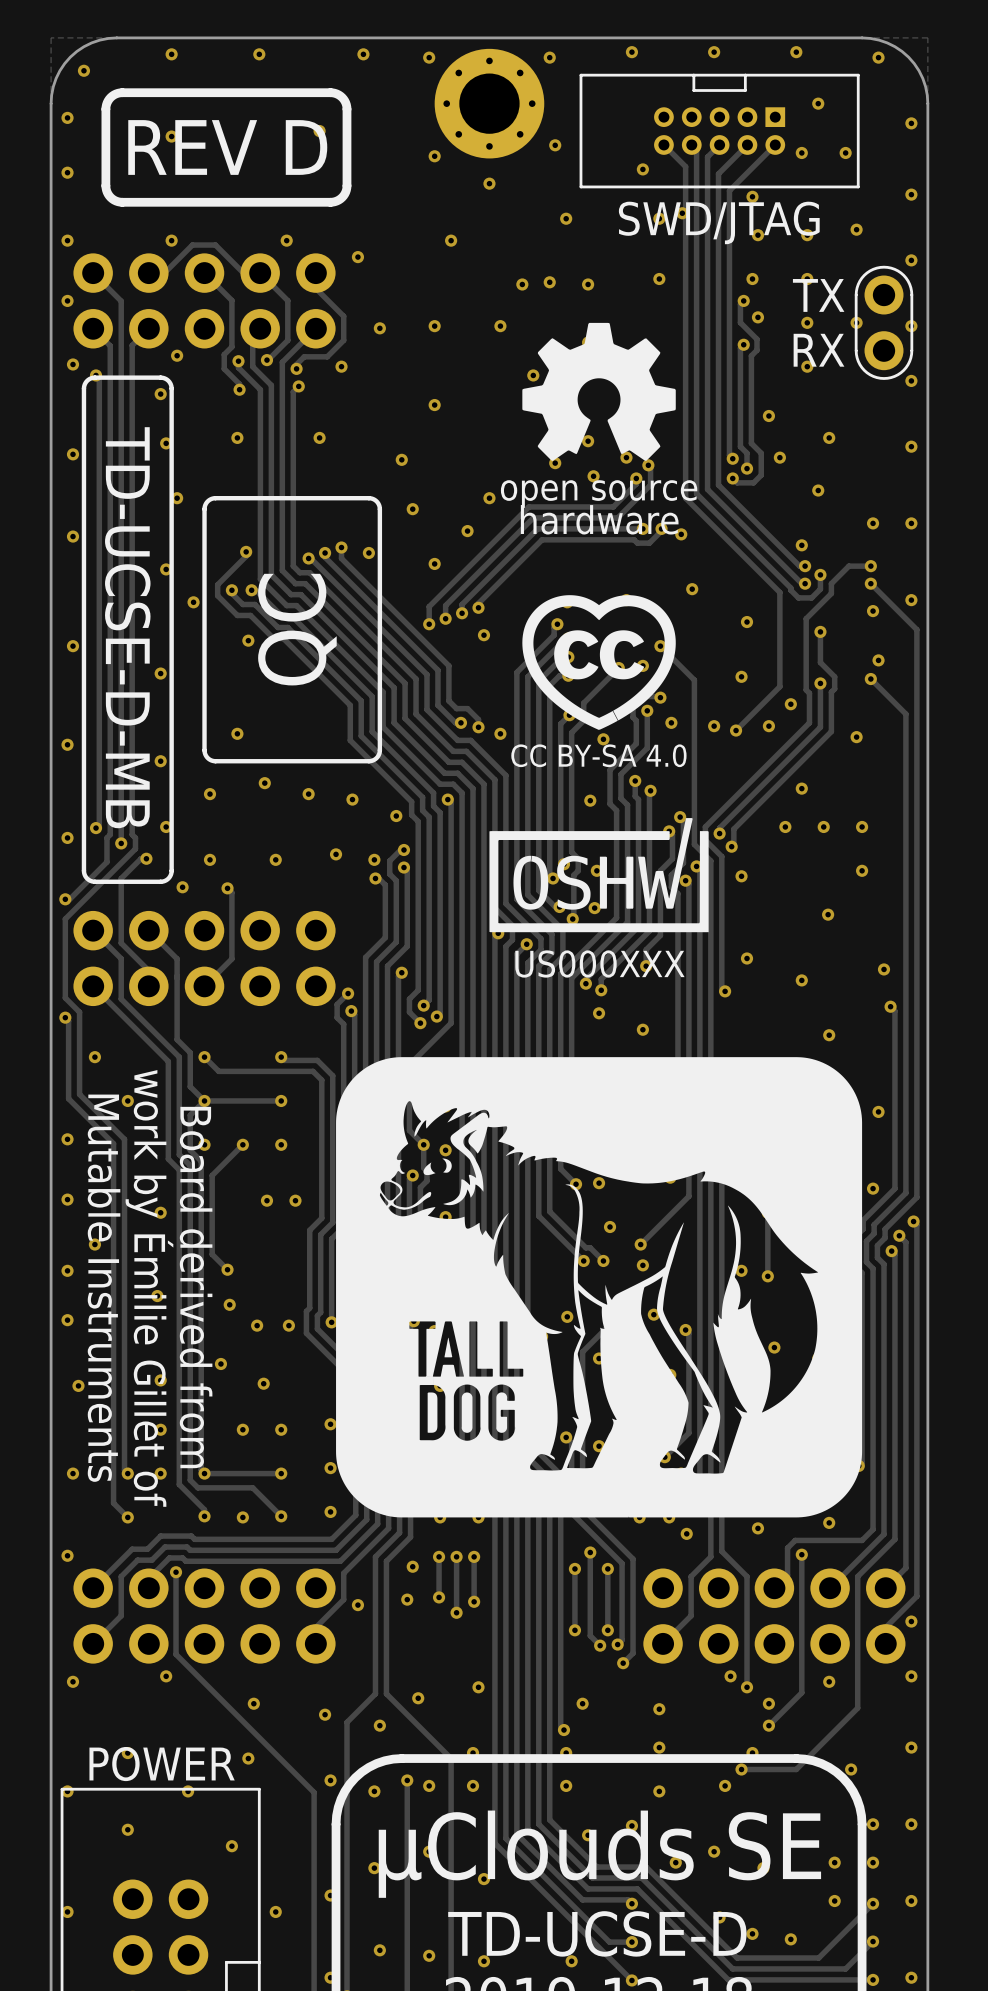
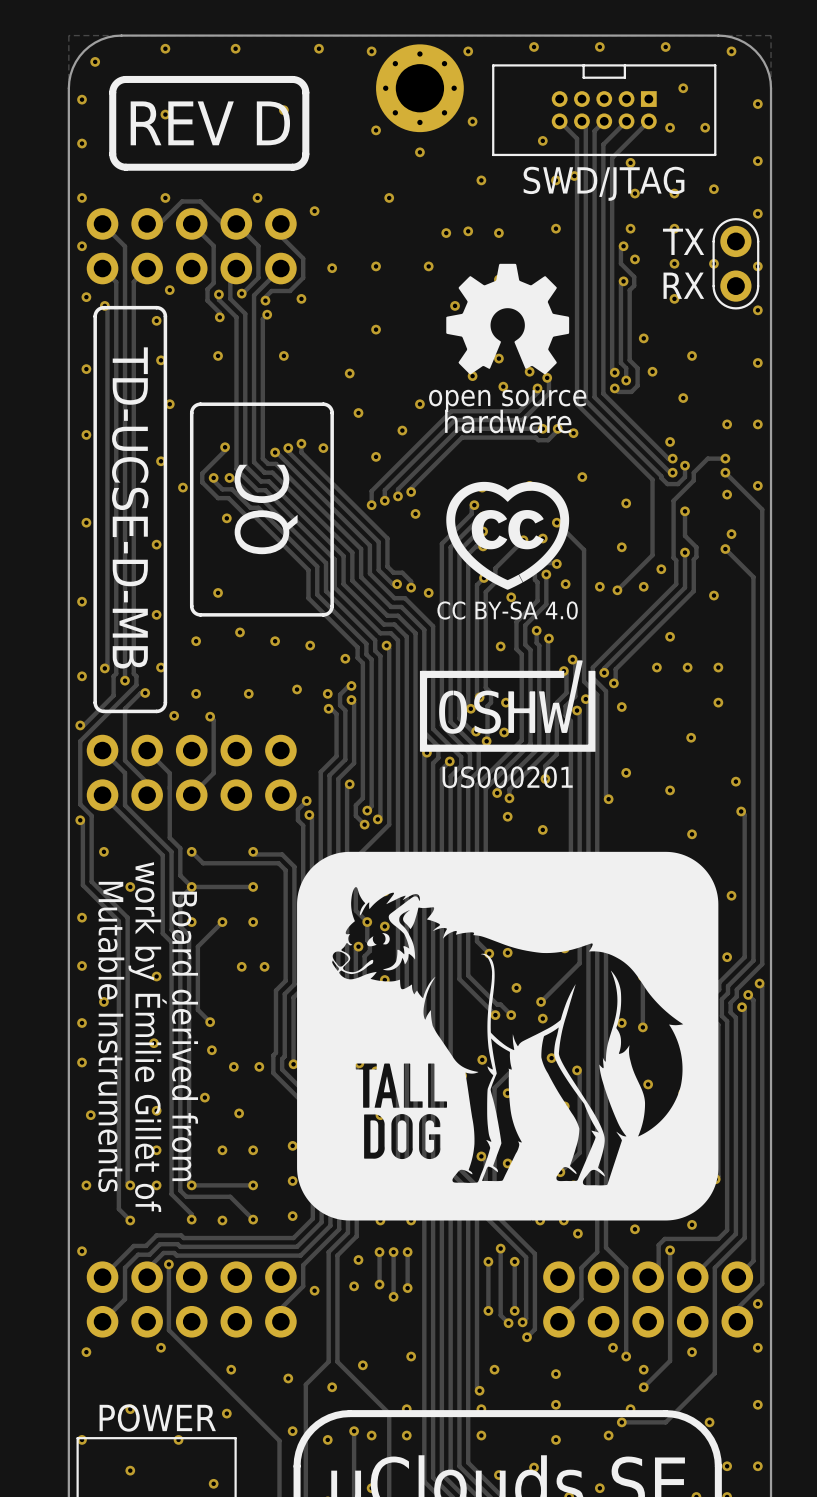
drawing shape: [489, 818, 709, 978] -> [419, 660, 596, 789]

